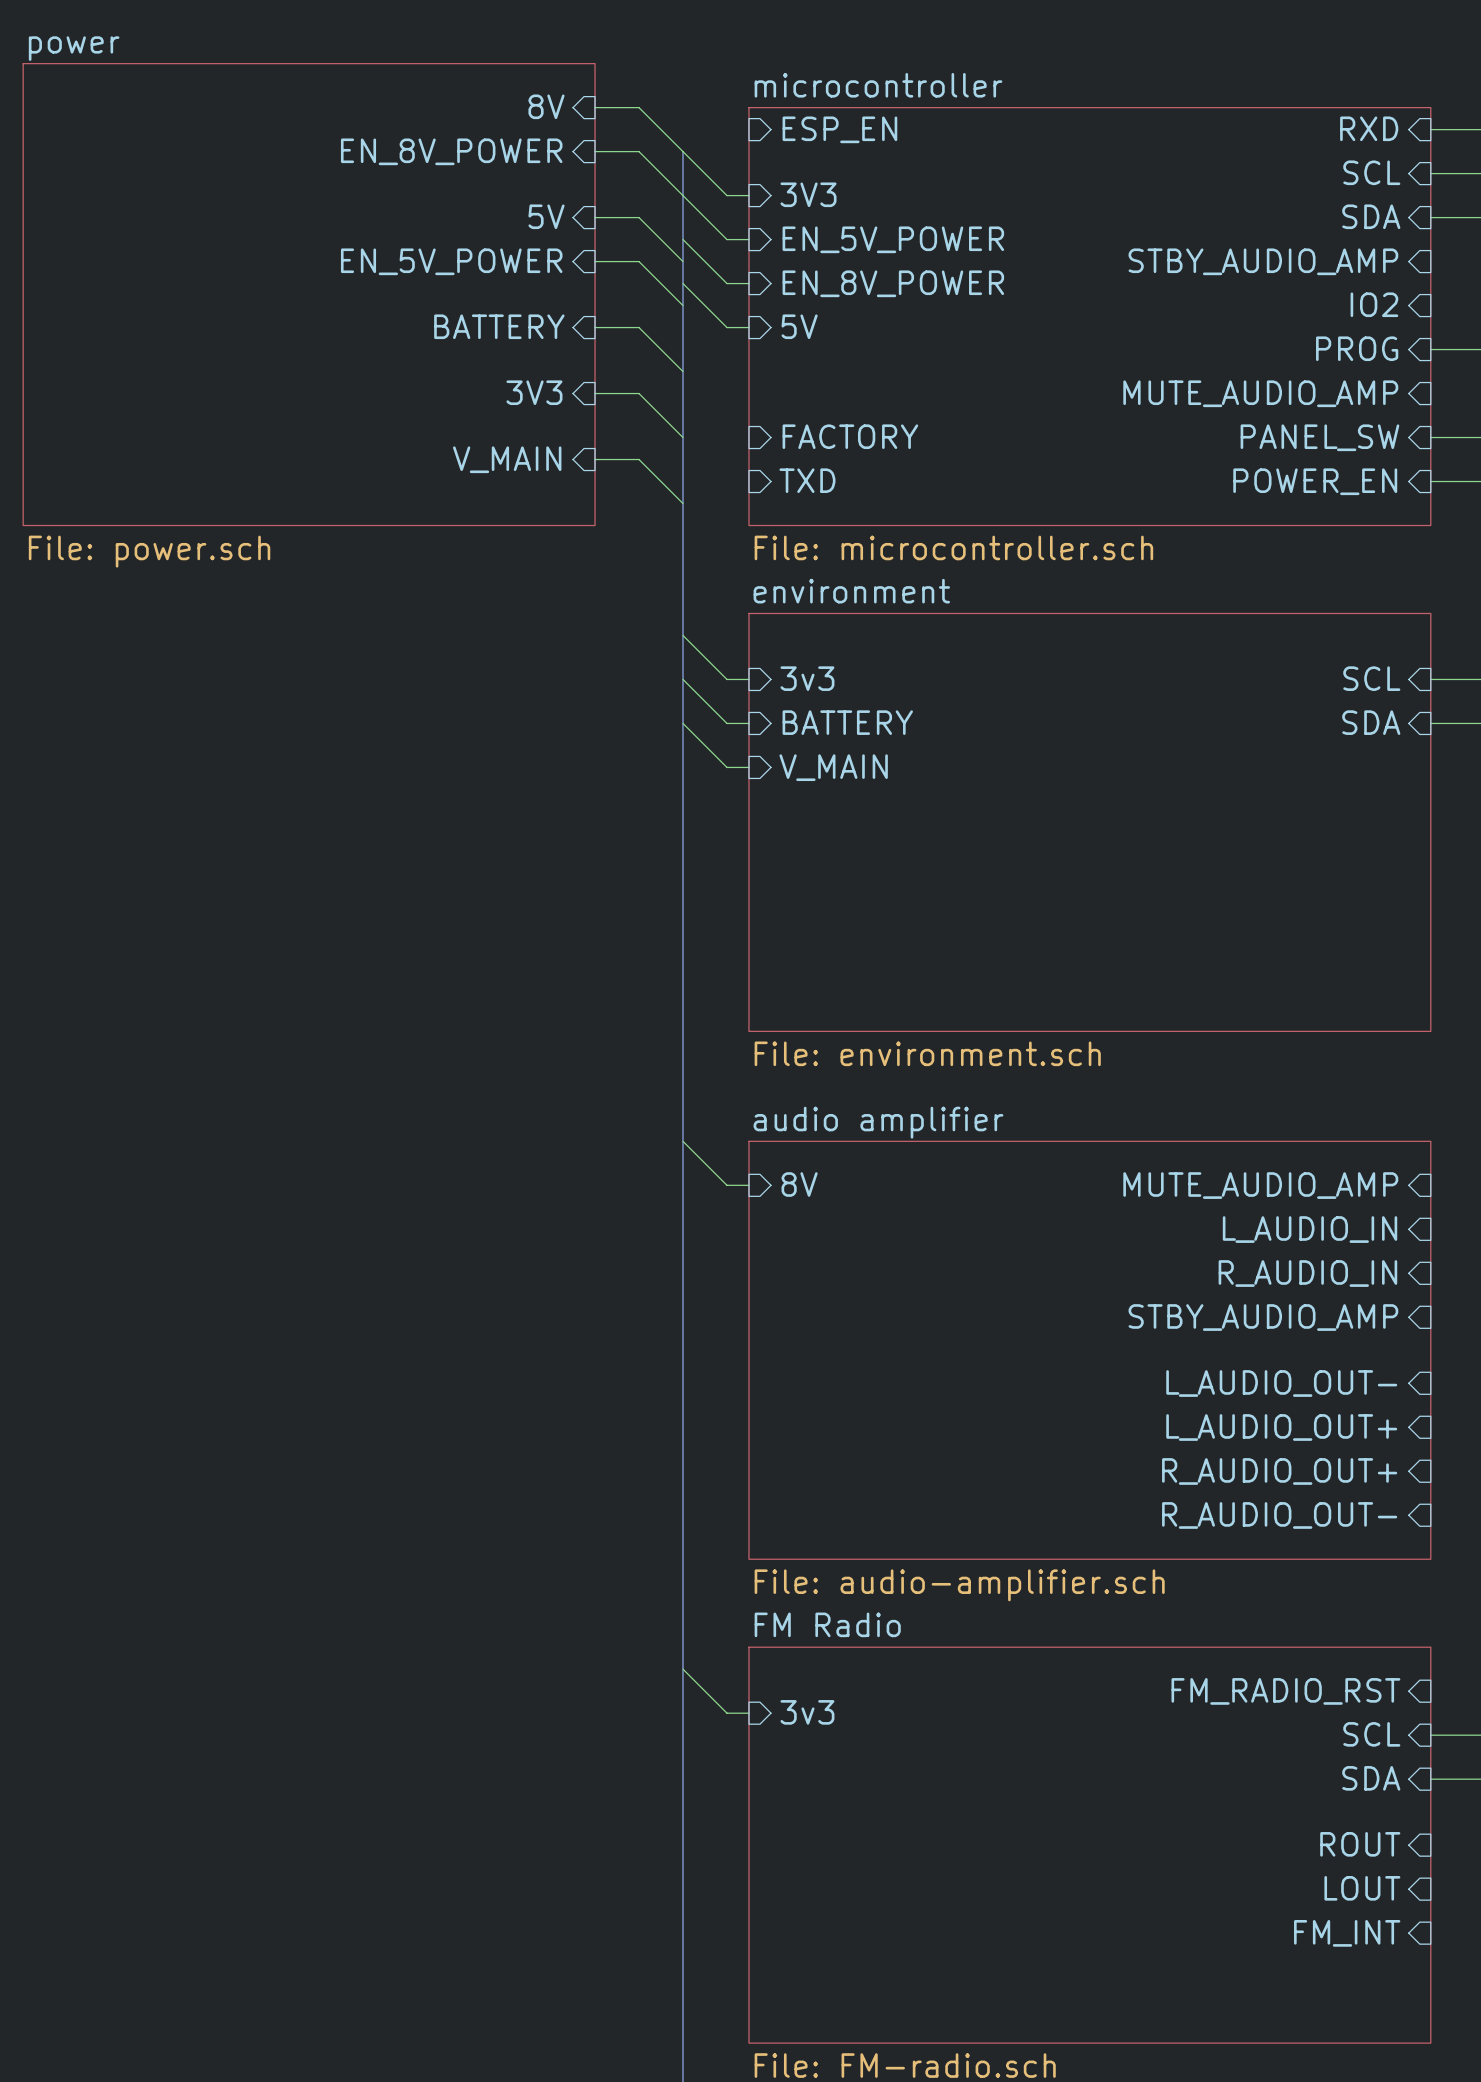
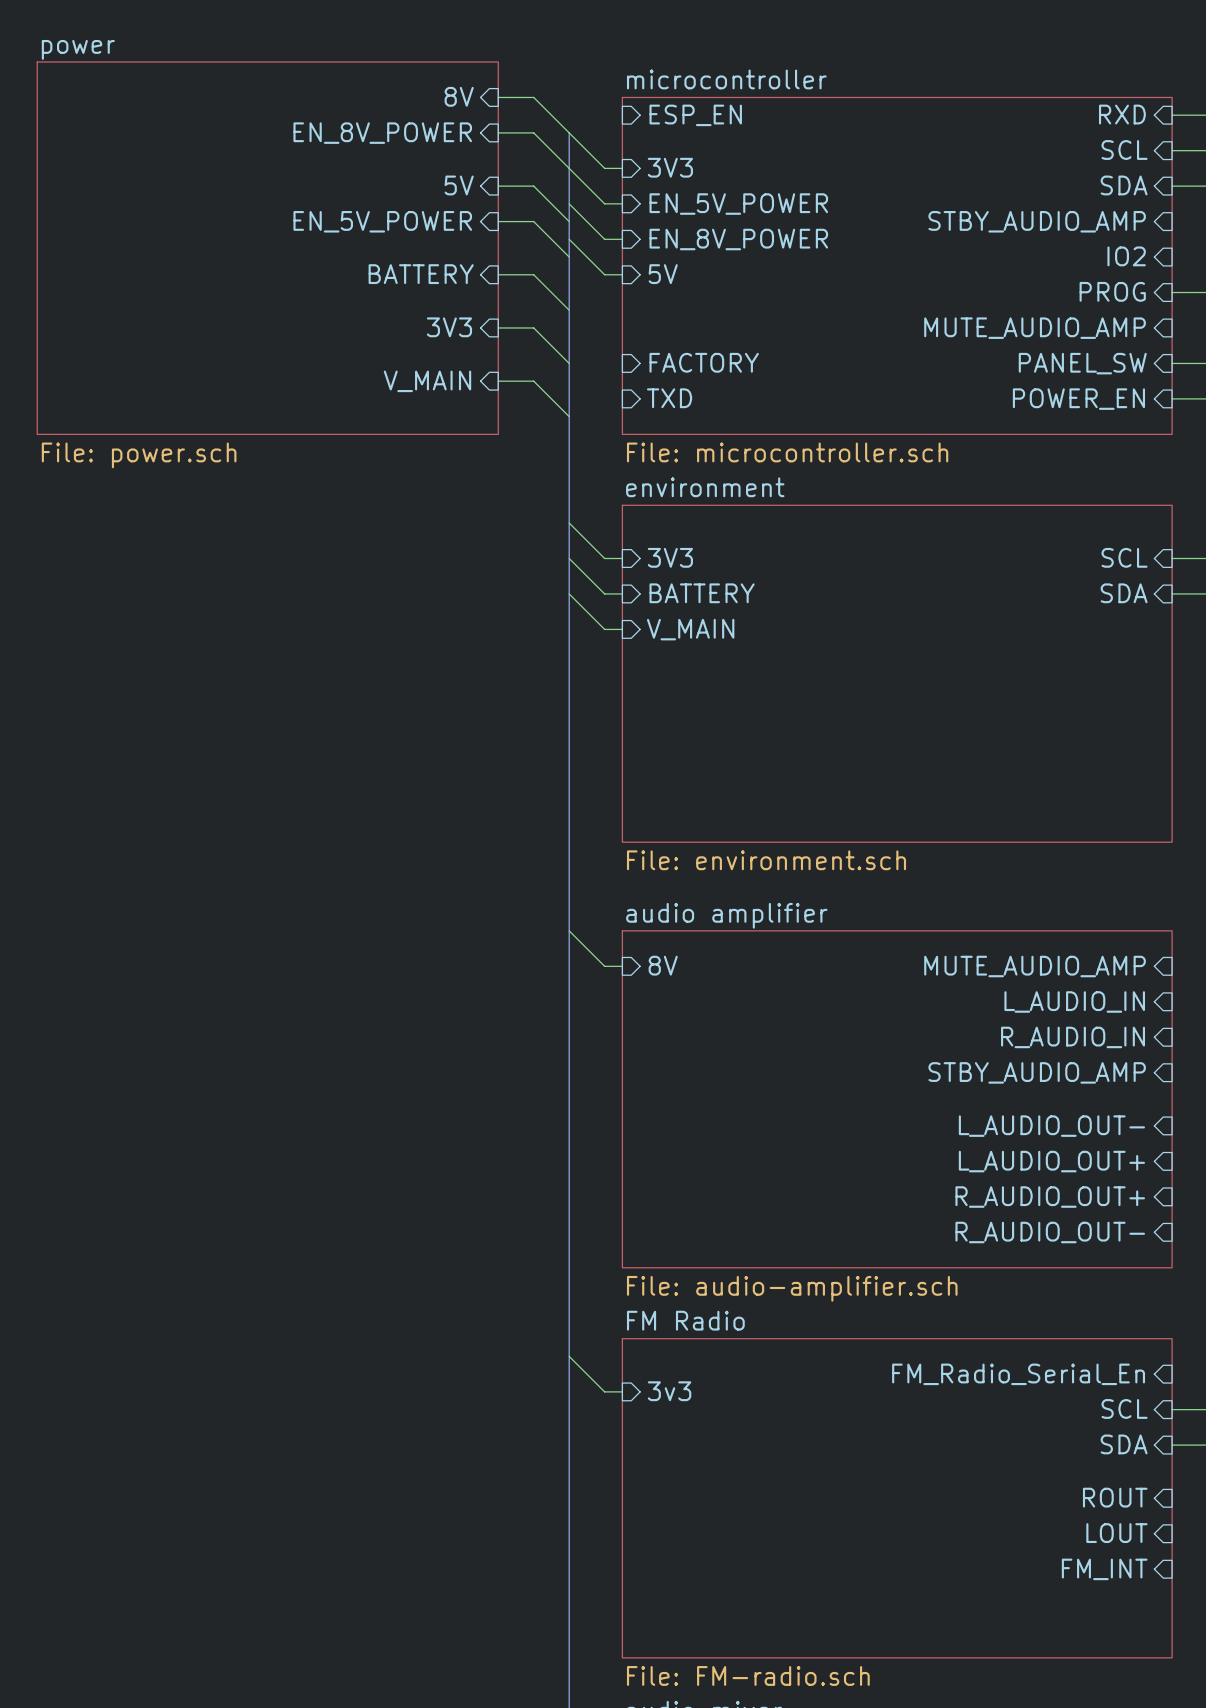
sheet pin: 3v3 (807, 678) -> 3V3 (670, 557)
sheet pin: FM_RADIO_RST (1285, 1691) -> FM_Radio_Serial_En (1018, 1374)

